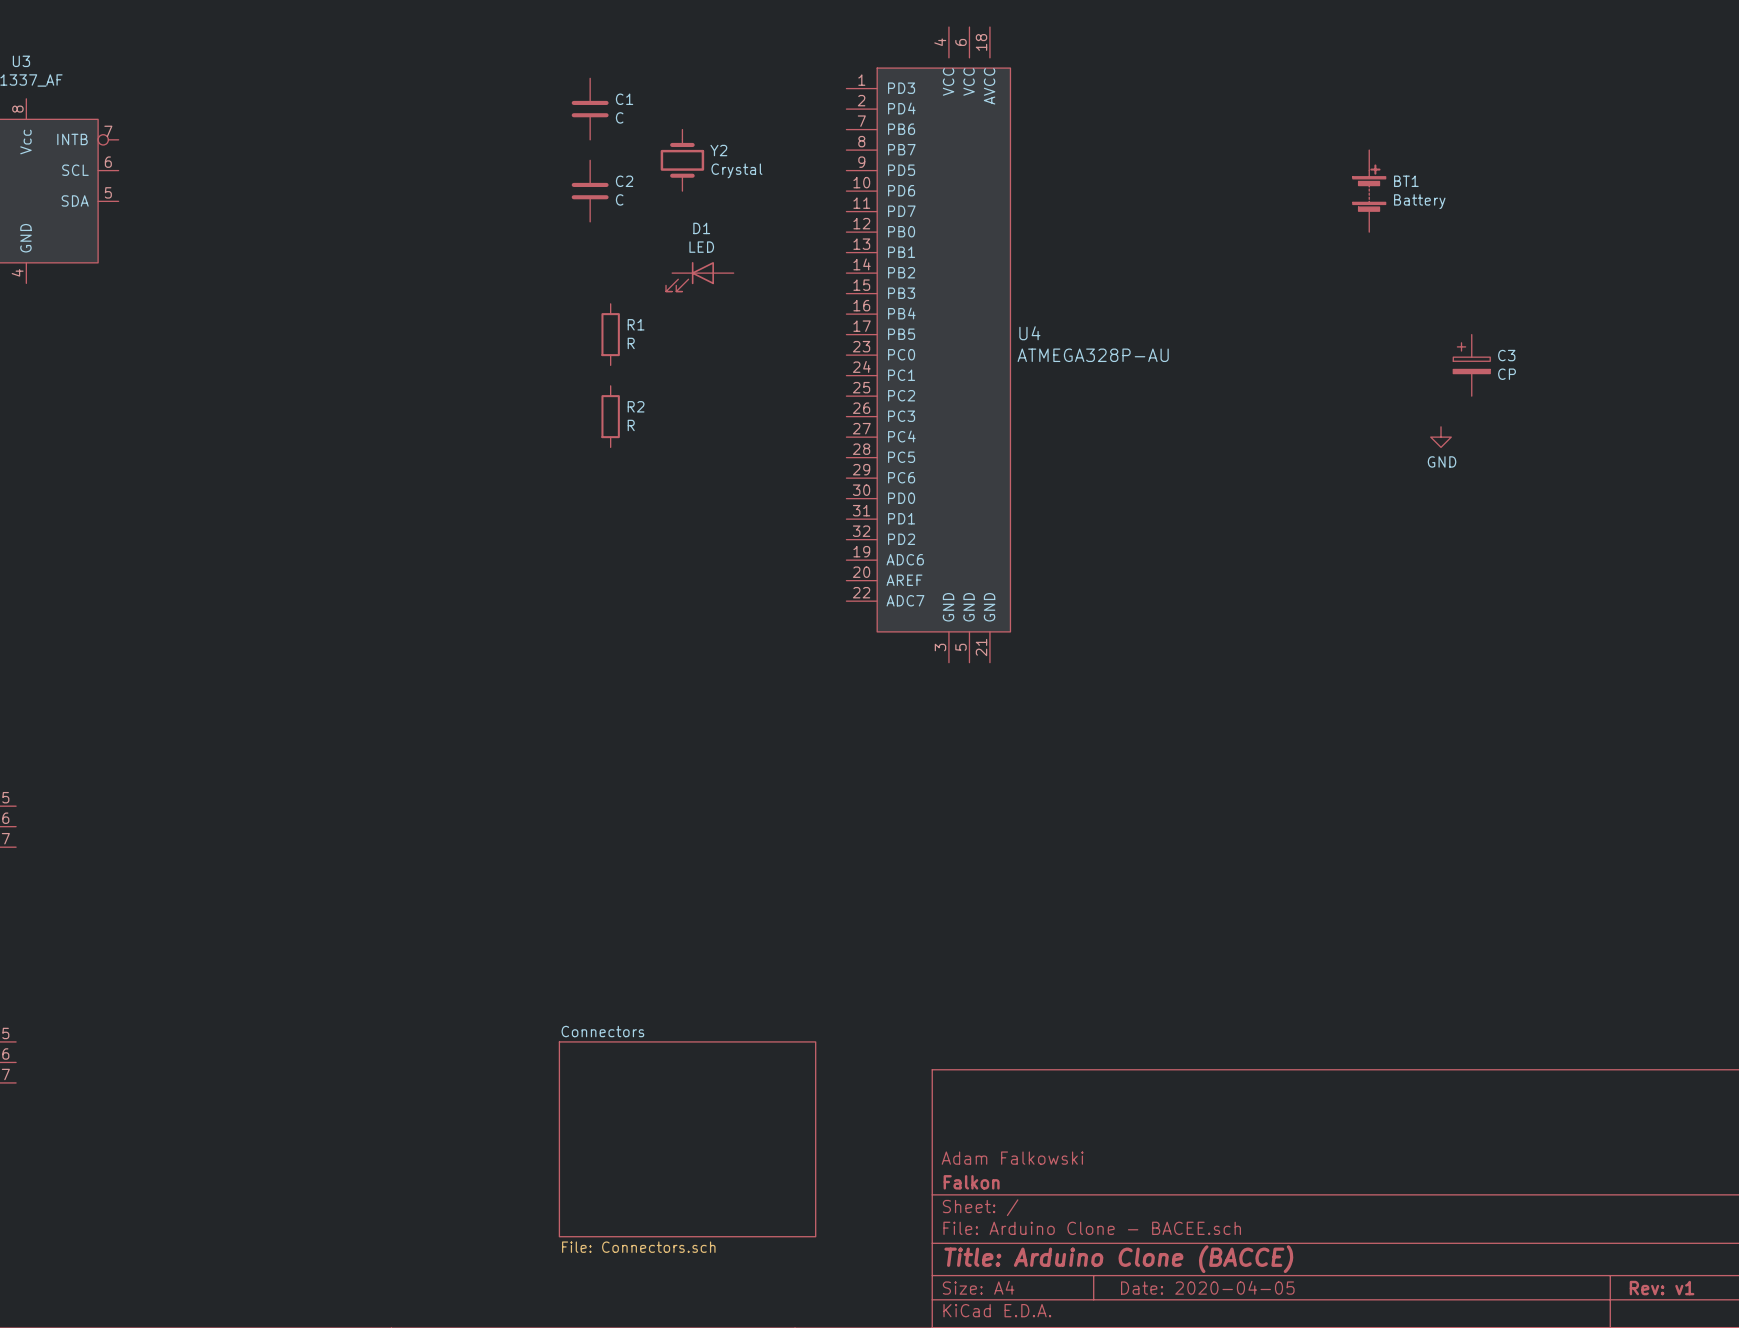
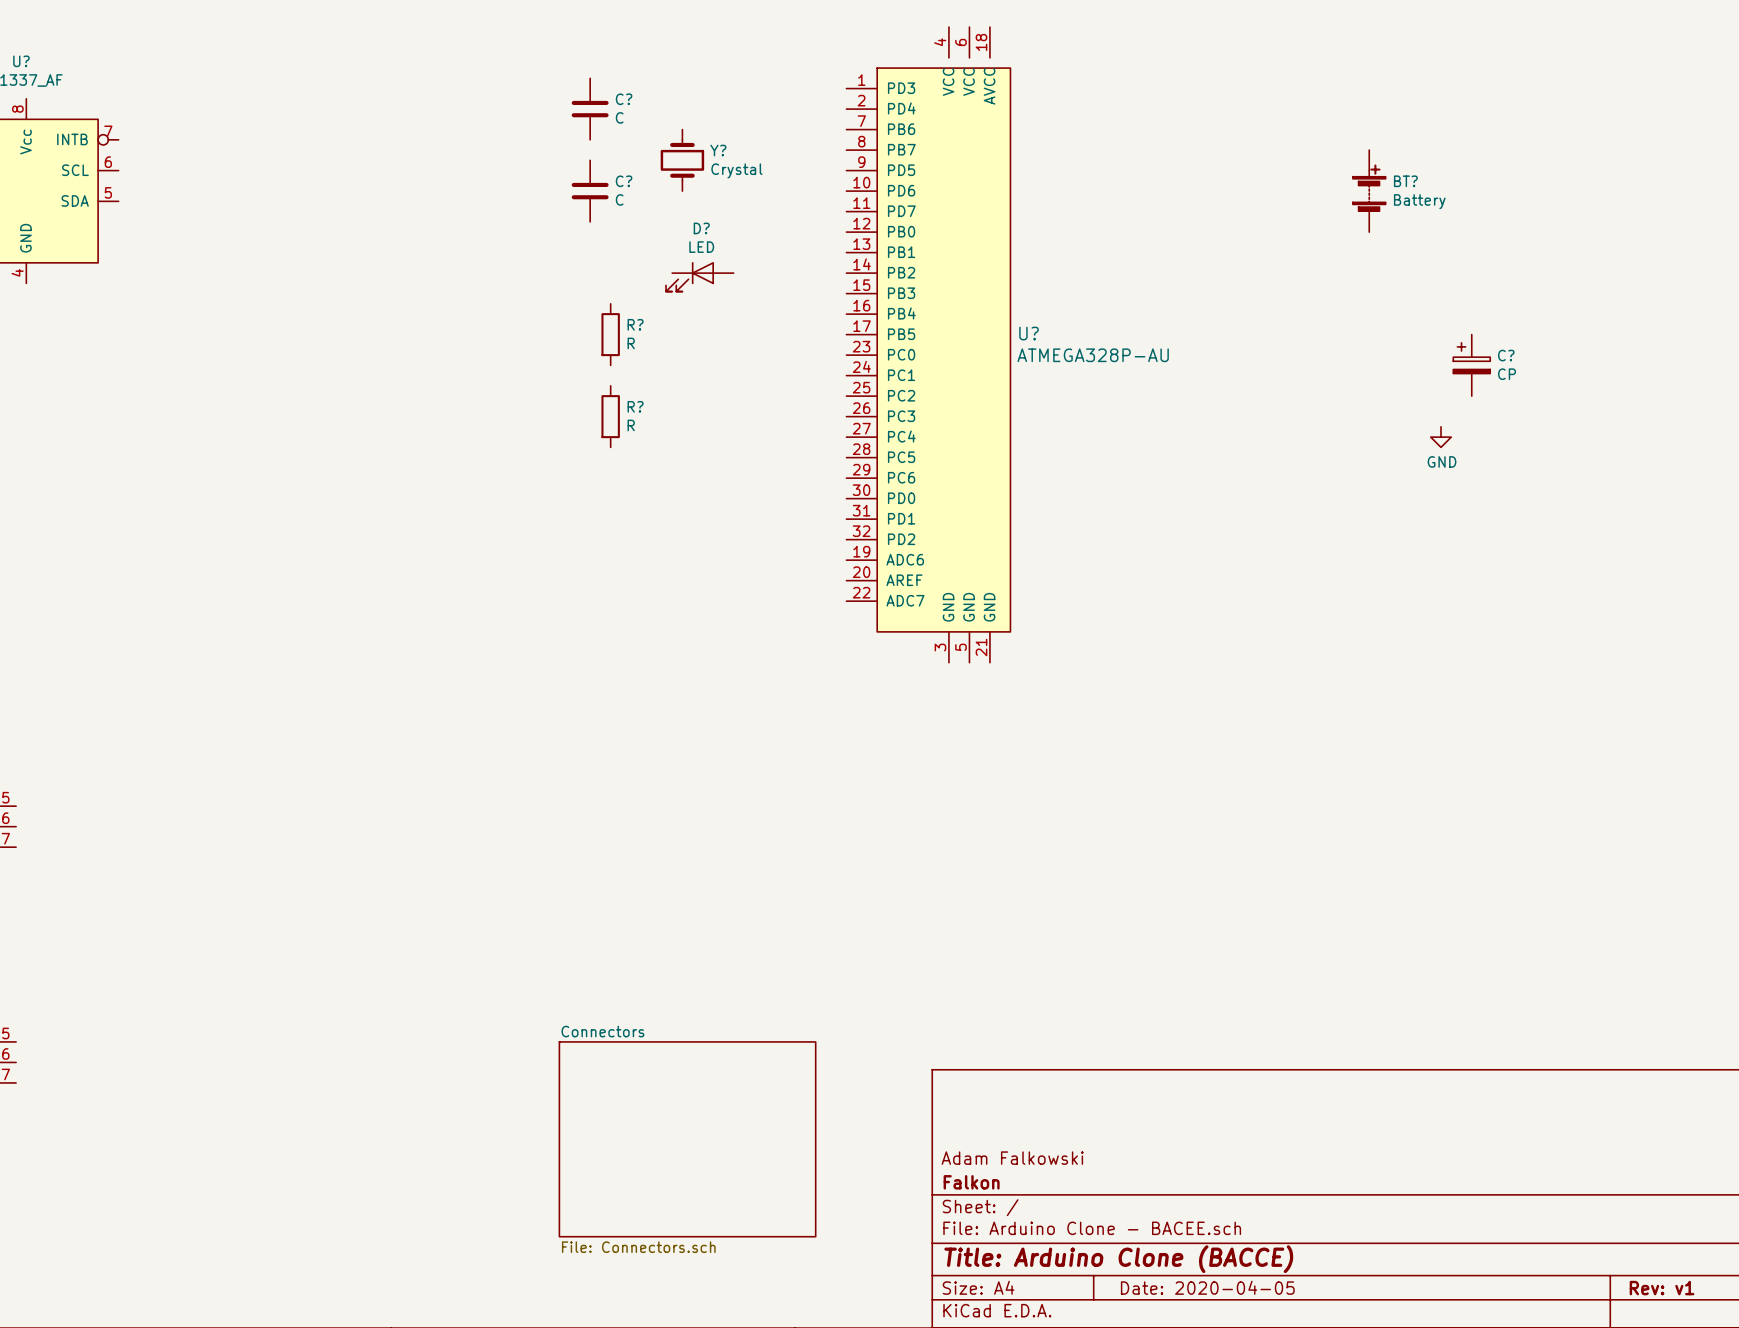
U3 name: U3 (21, 61) -> U? (21, 61)
C1 name: C1 (624, 99) -> C? (624, 99)
Y2 name: Y2 (718, 150) -> Y? (718, 150)
C2 name: C2 (624, 181) -> C? (624, 181)
BT1 name: BT1 (1406, 181) -> BT? (1405, 181)
D1 name: D1 (701, 228) -> D? (701, 228)
R1 name: R1 (636, 324) -> R? (635, 324)
U4 name: U4 (1029, 333) -> U? (1029, 333)
C3 name: C3 (1506, 355) -> C? (1506, 355)
R2 name: R2 (636, 406) -> R? (635, 406)

